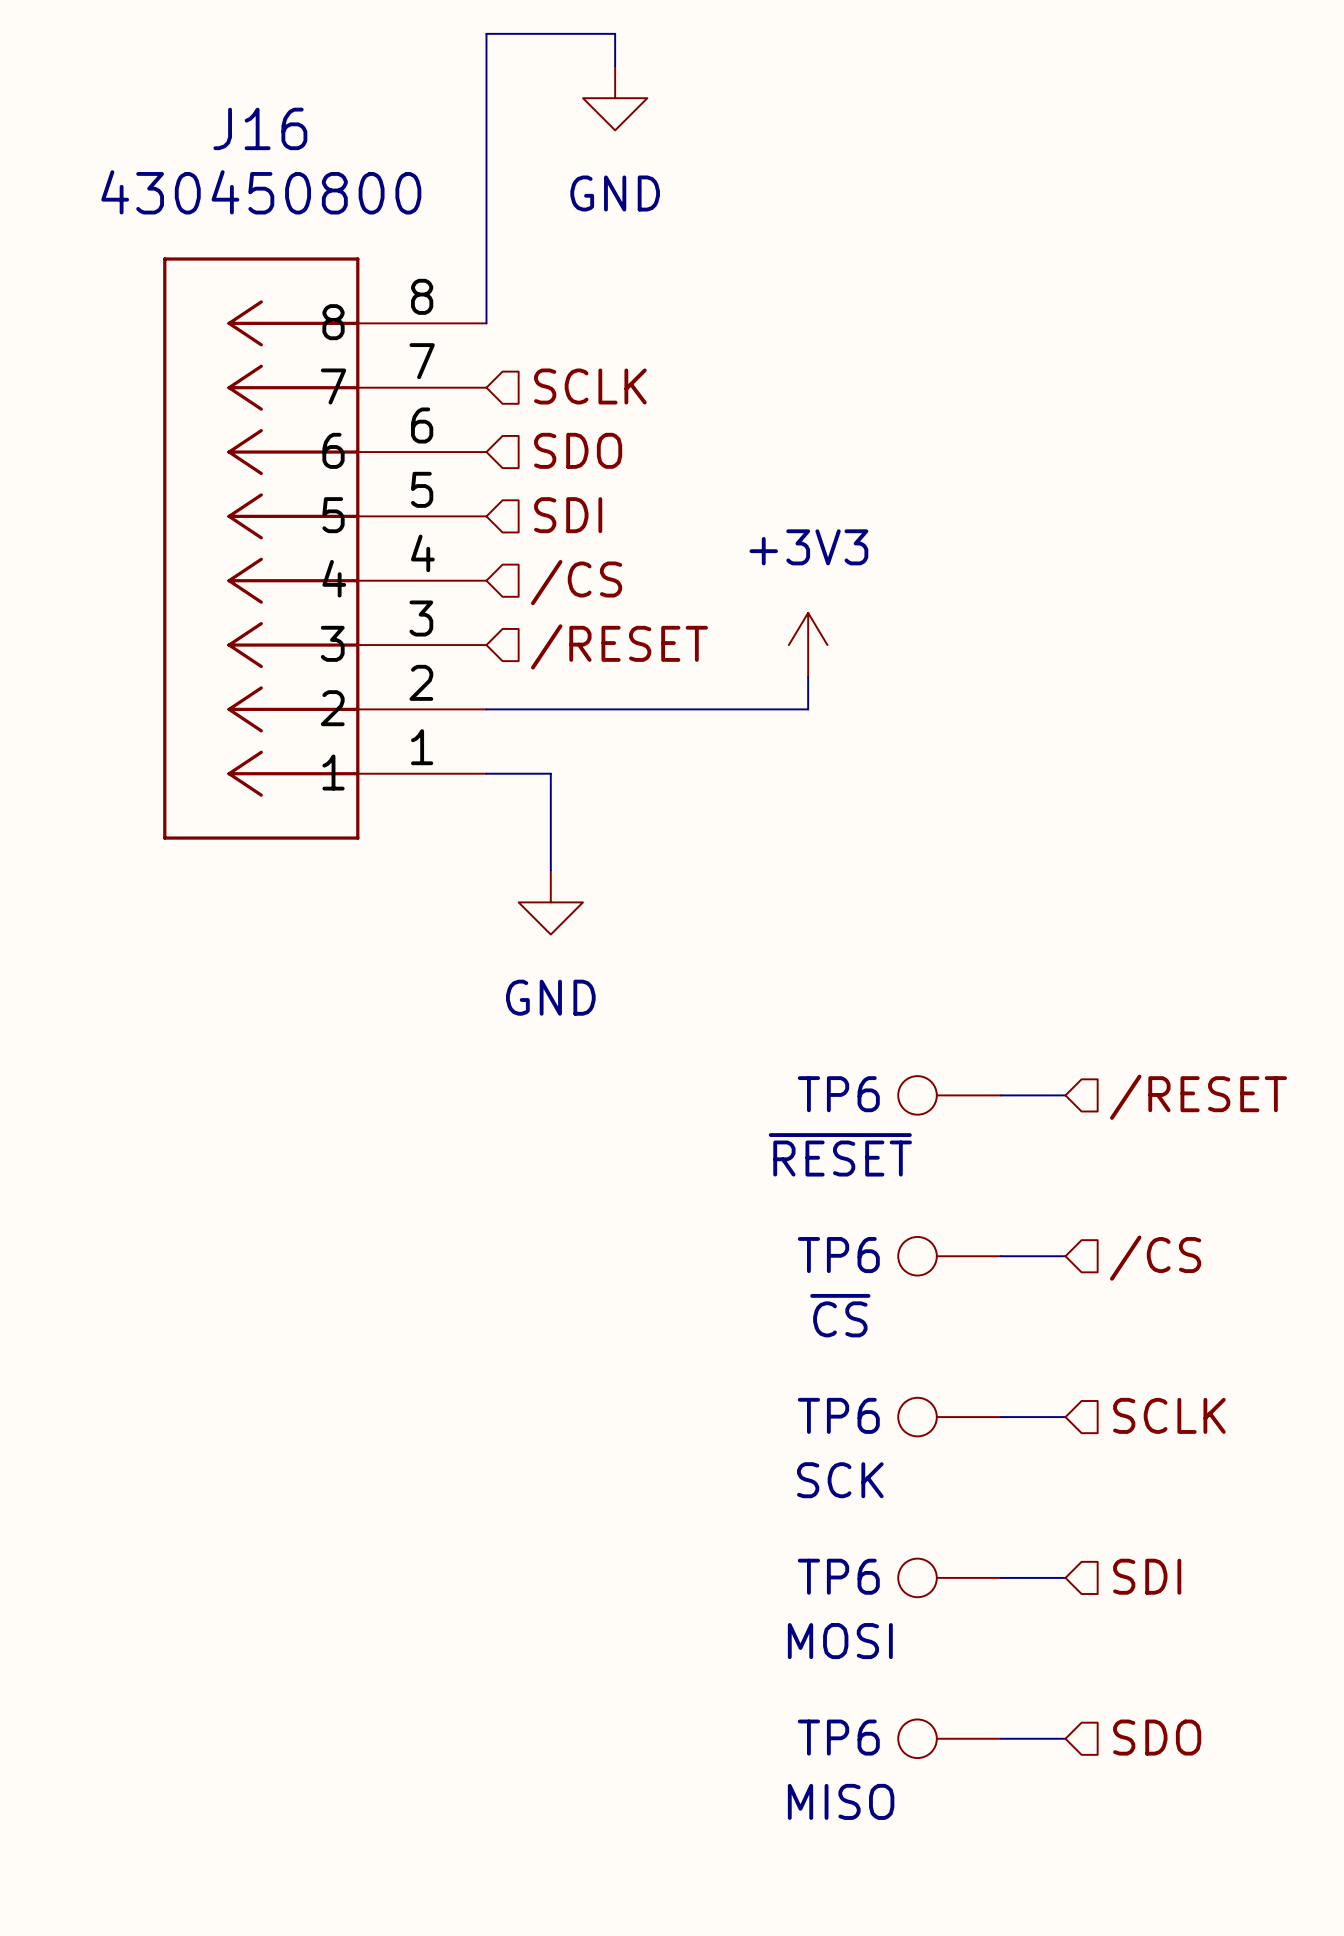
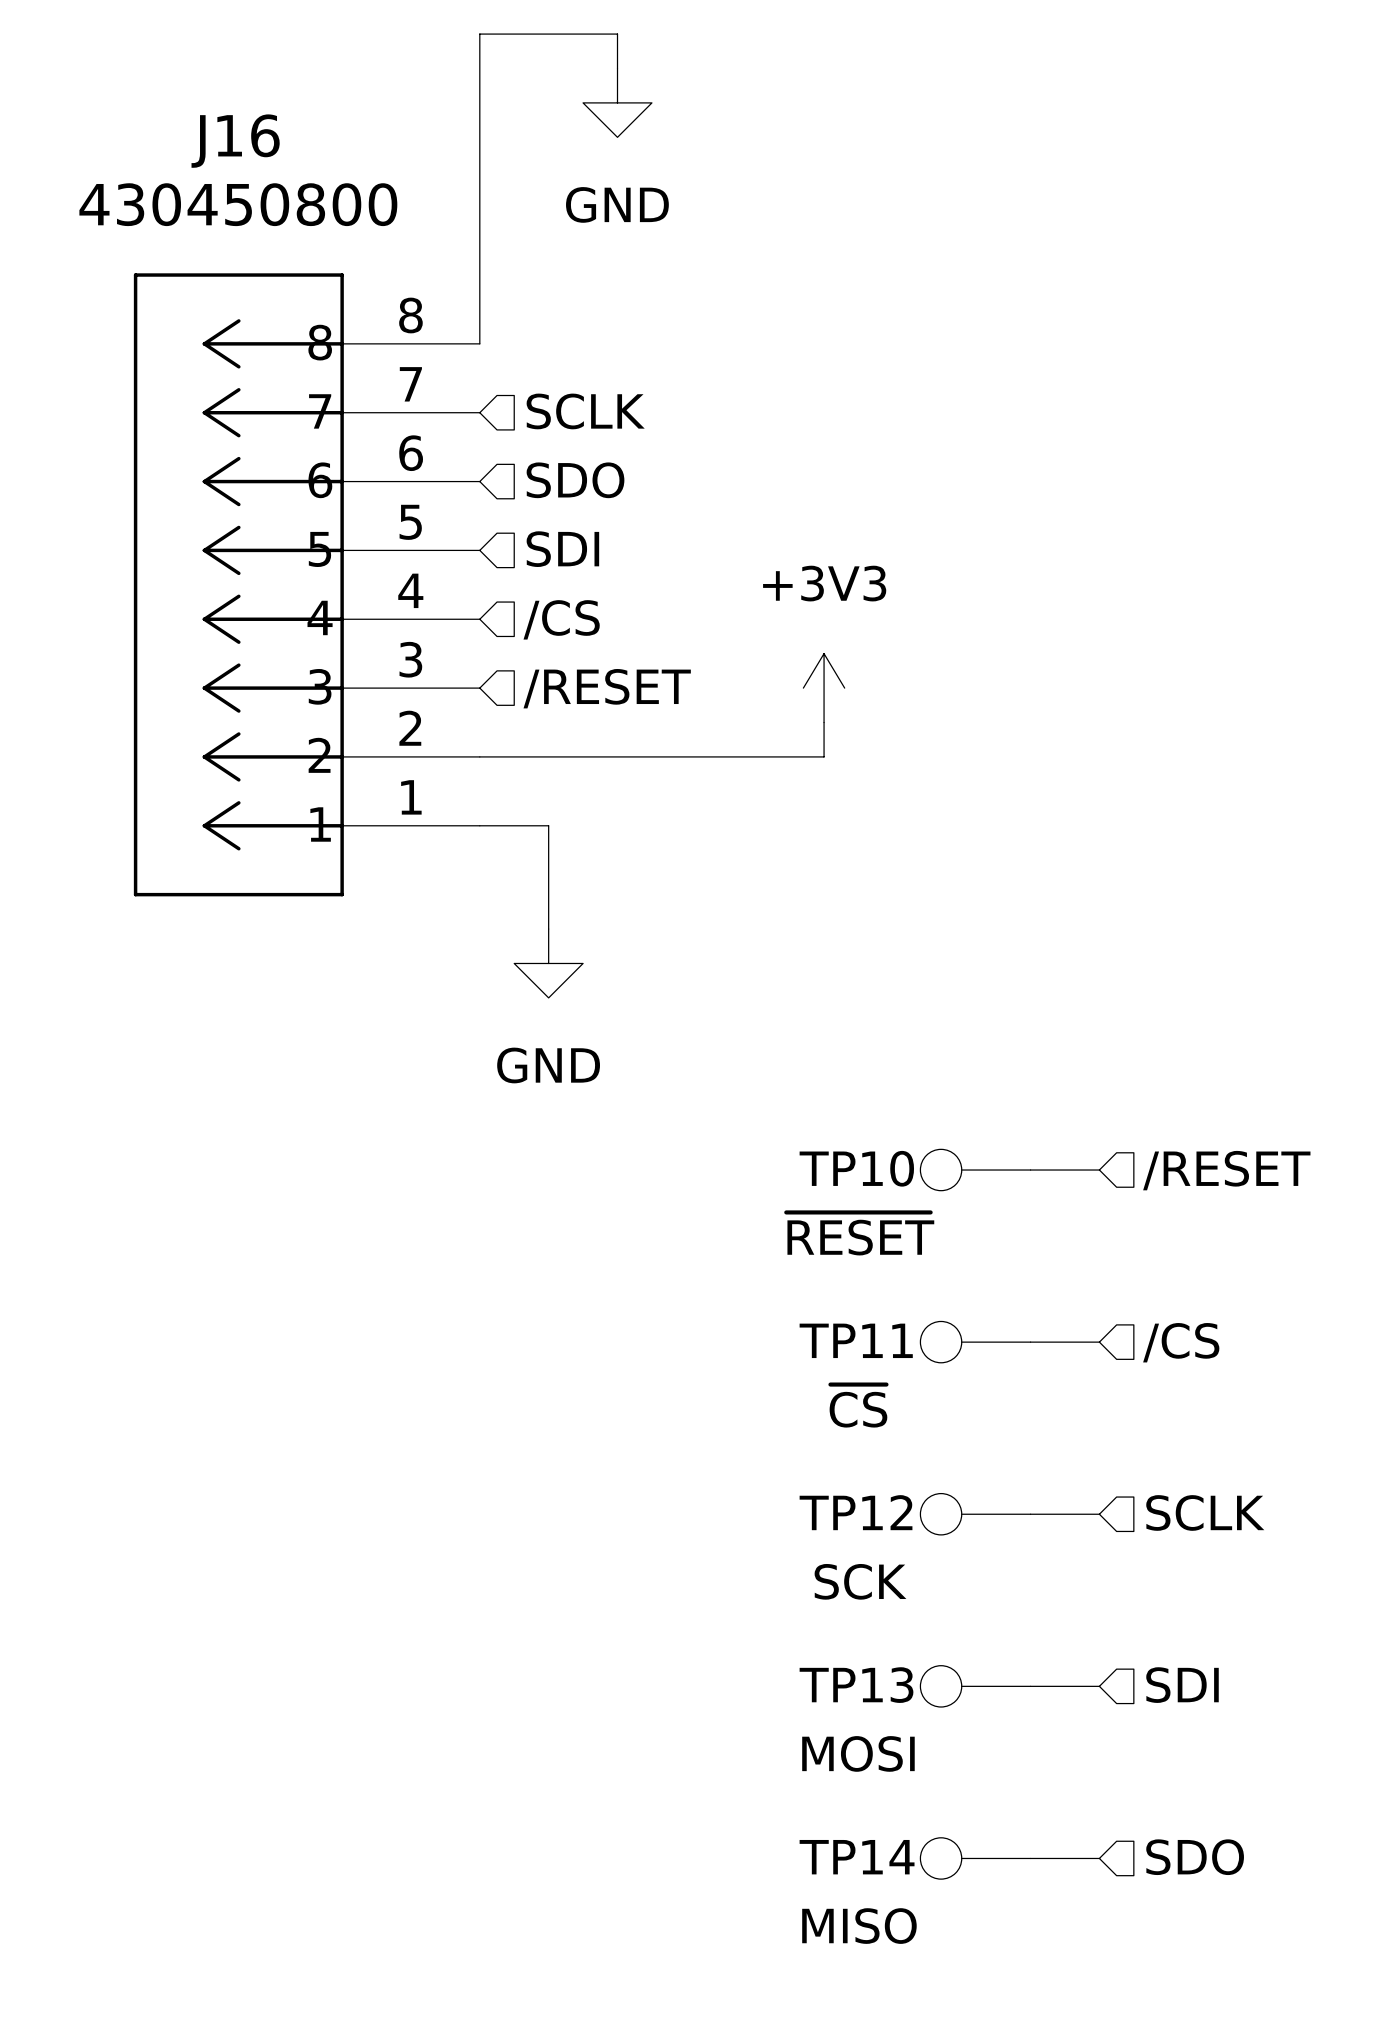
TP6 name: TP6 (838, 1094) -> TP10 (856, 1168)
TP6 name: TP6 (838, 1255) -> TP11 (856, 1340)
TP6 name: TP6 (838, 1415) -> TP12 (856, 1512)
TP6 name: TP6 (838, 1576) -> TP13 (856, 1685)
TP6 name: TP6 (838, 1737) -> TP14 (857, 1857)

